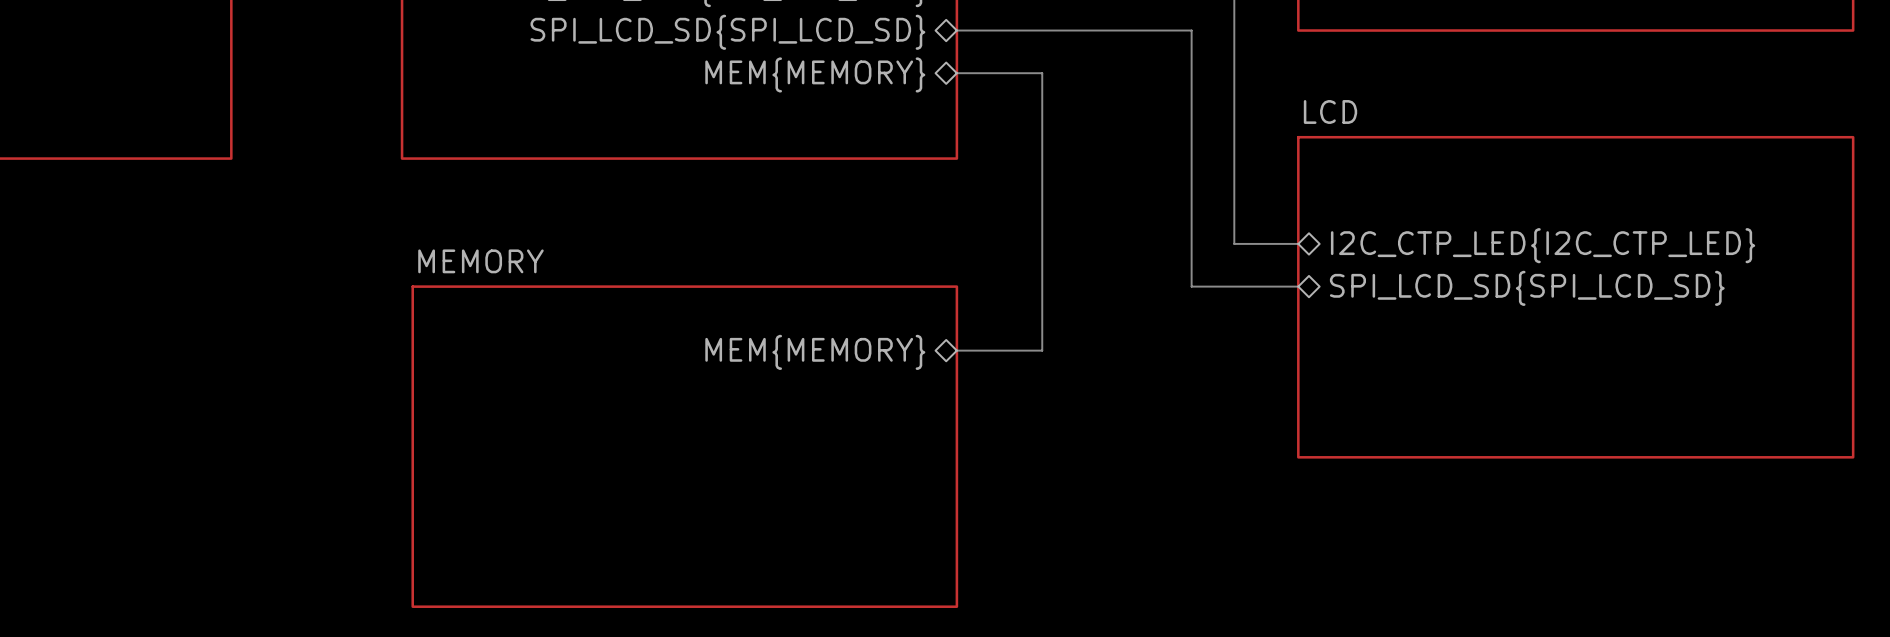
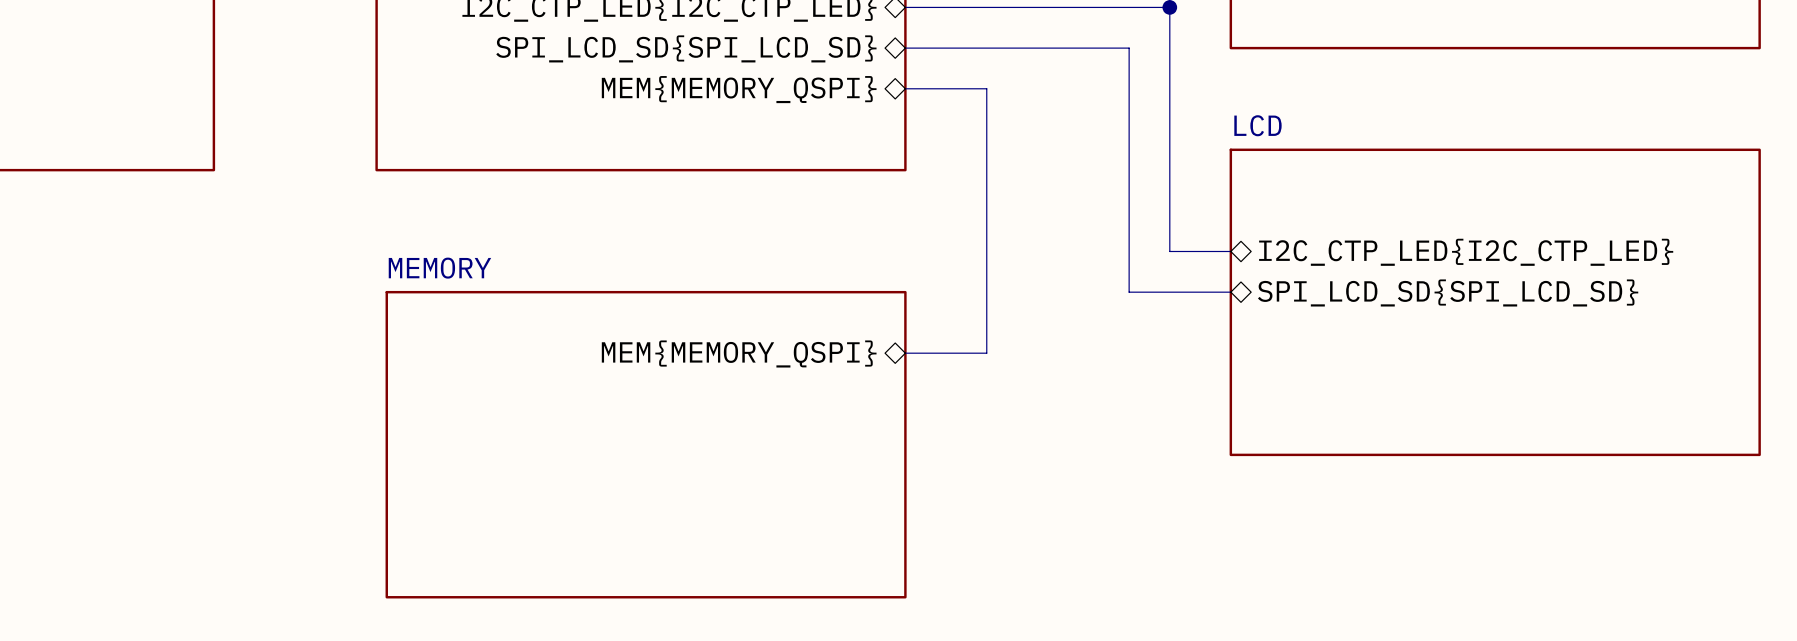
sheet pin: MEM{MEMORY} (815, 74) -> MEM{MEMORY_QSPI} (739, 89)
sheet pin: MEM{MEMORY} (815, 352) -> MEM{MEMORY_QSPI} (739, 353)

